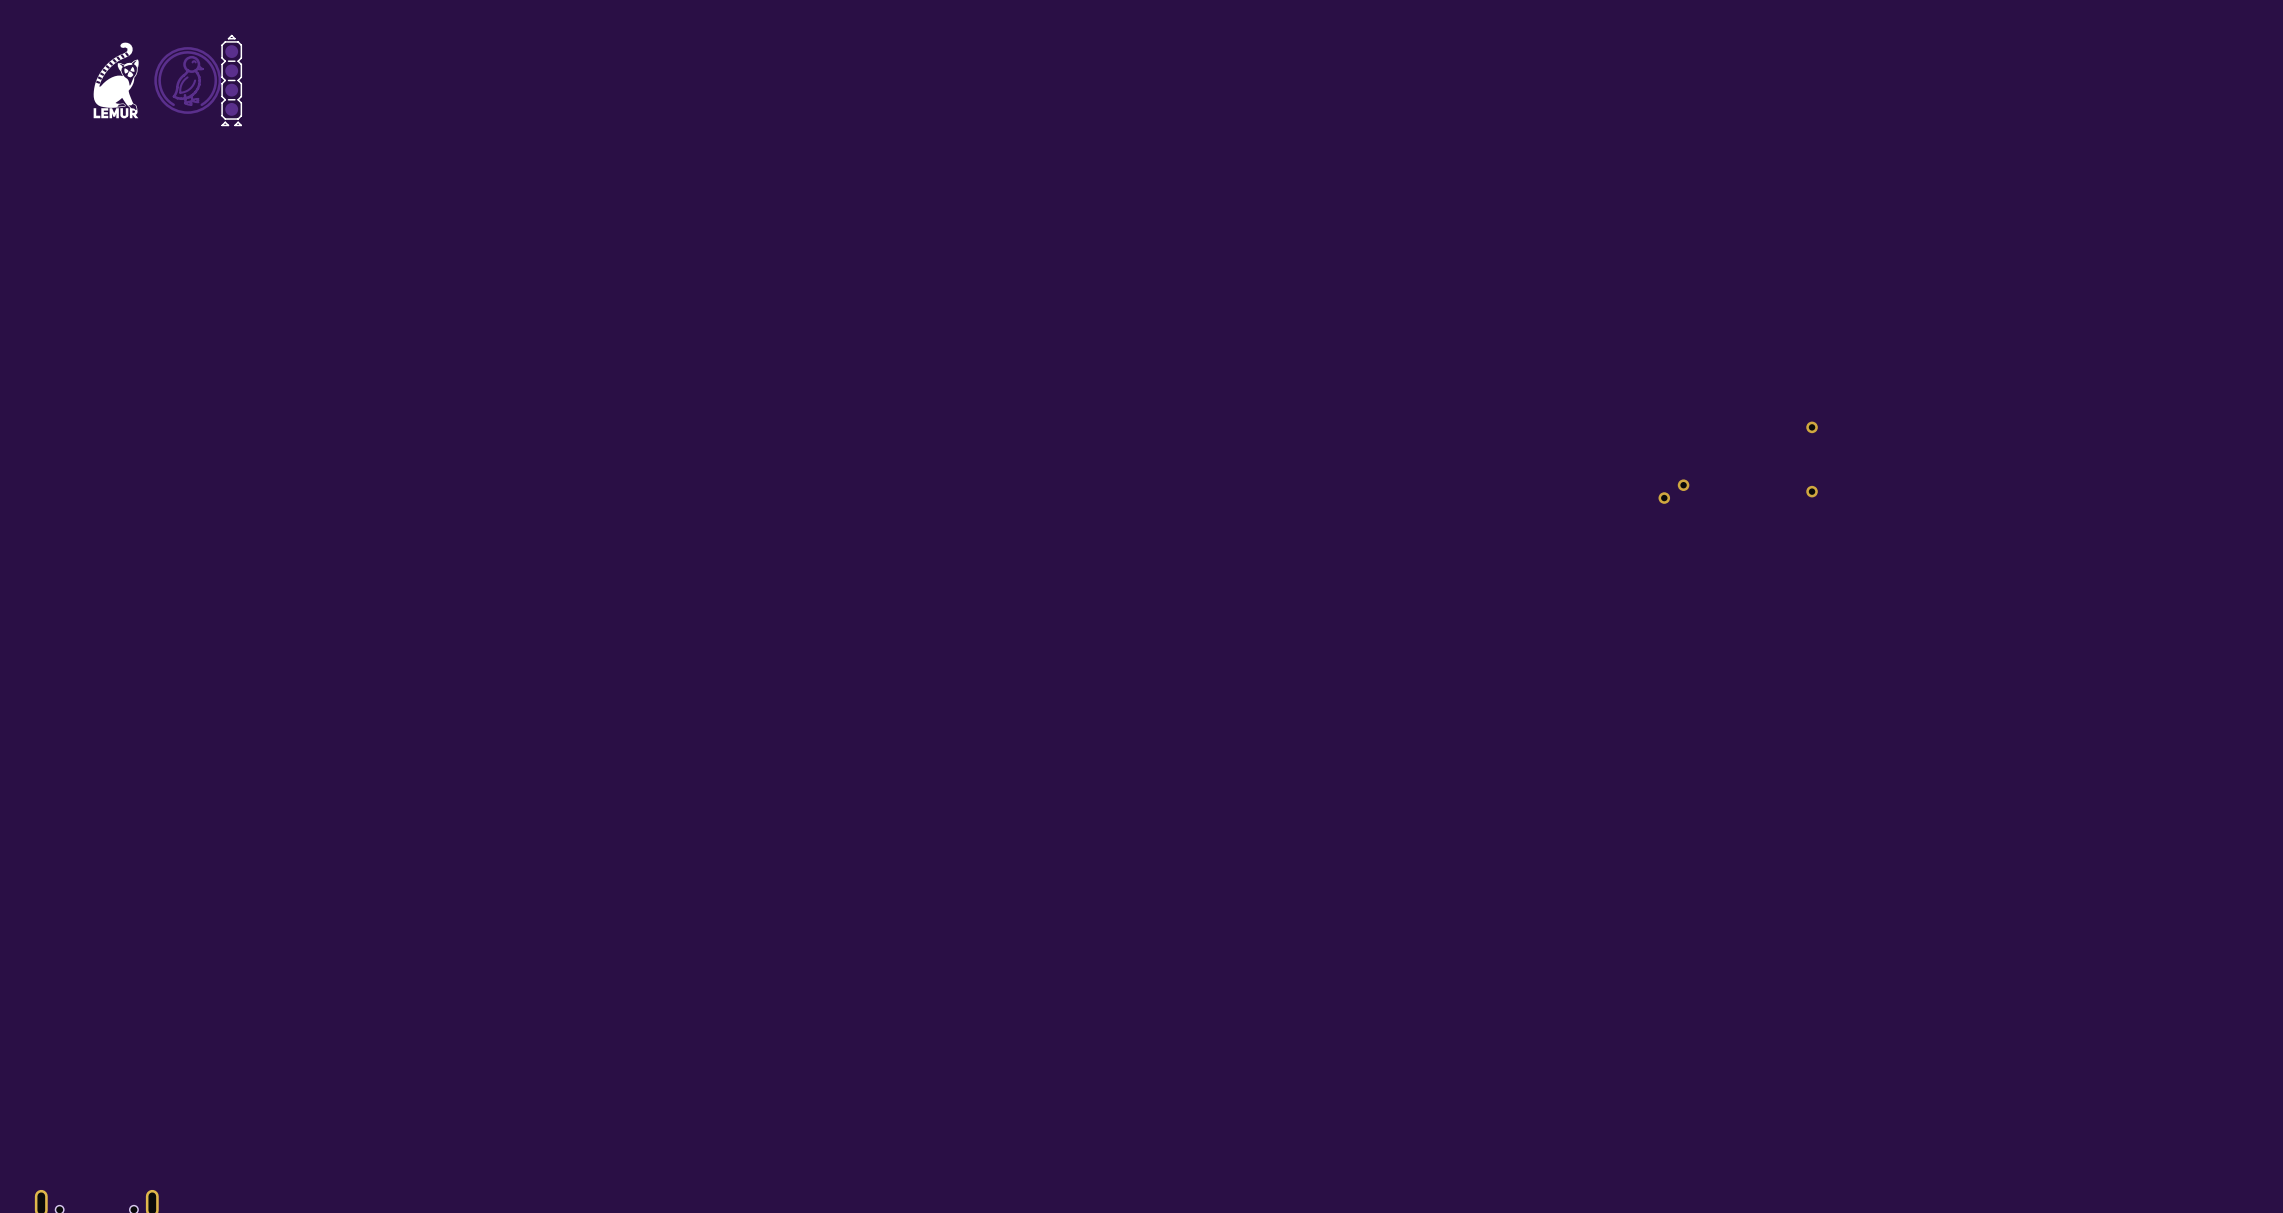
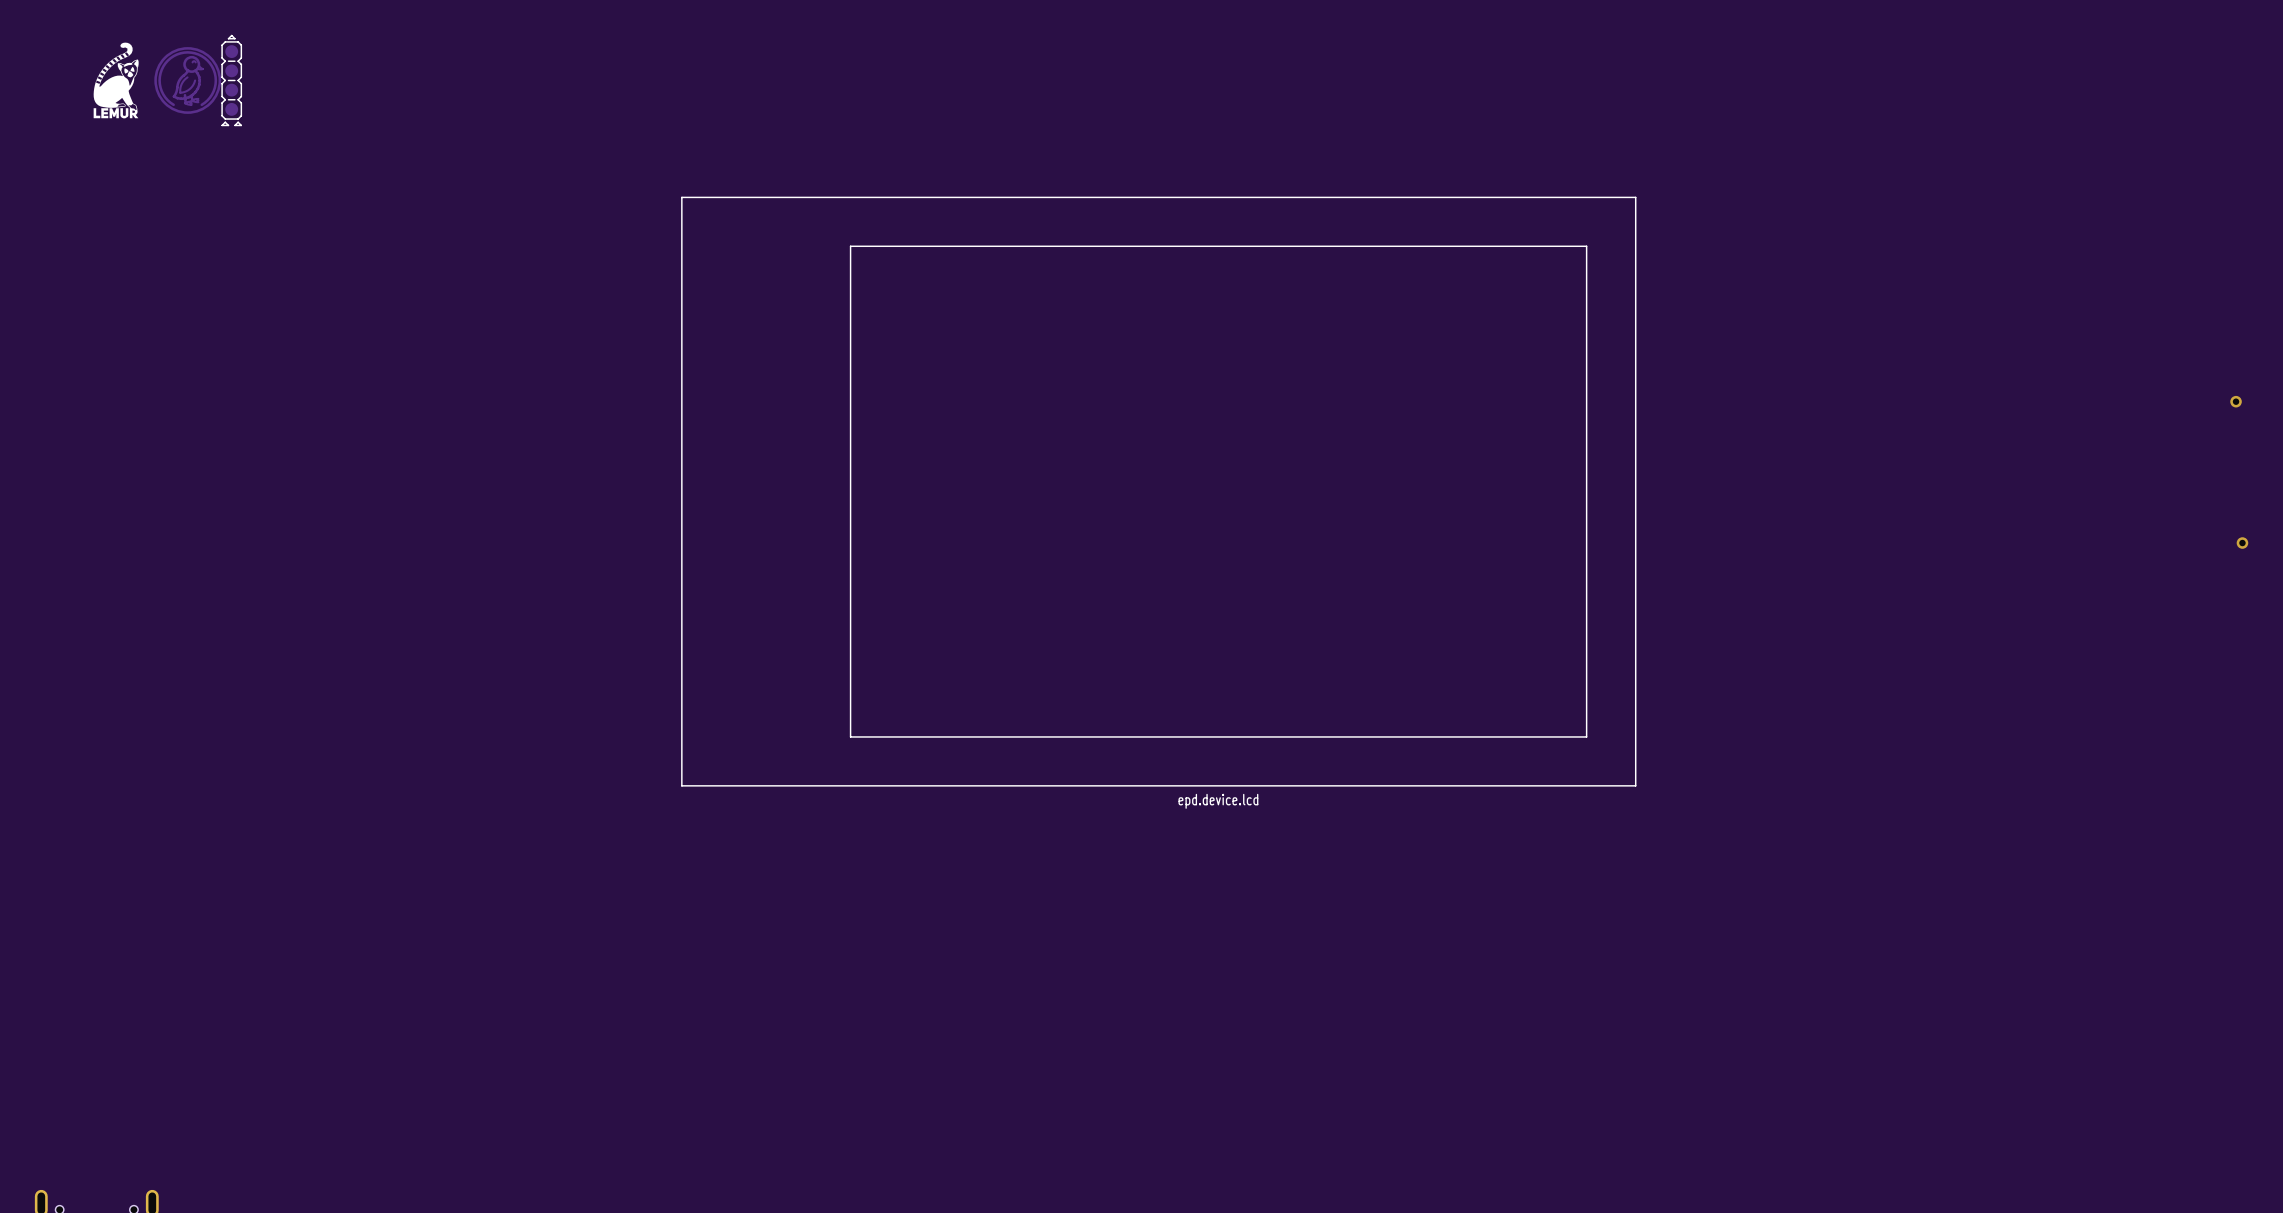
via: none -> (2236, 401)
via: (1812, 427) -> none
via: (1683, 485) -> none
epd.device.lcd: none -> (1158, 491)
via: (1812, 491) -> none
via: (1664, 498) -> none
via: none -> (2242, 543)

